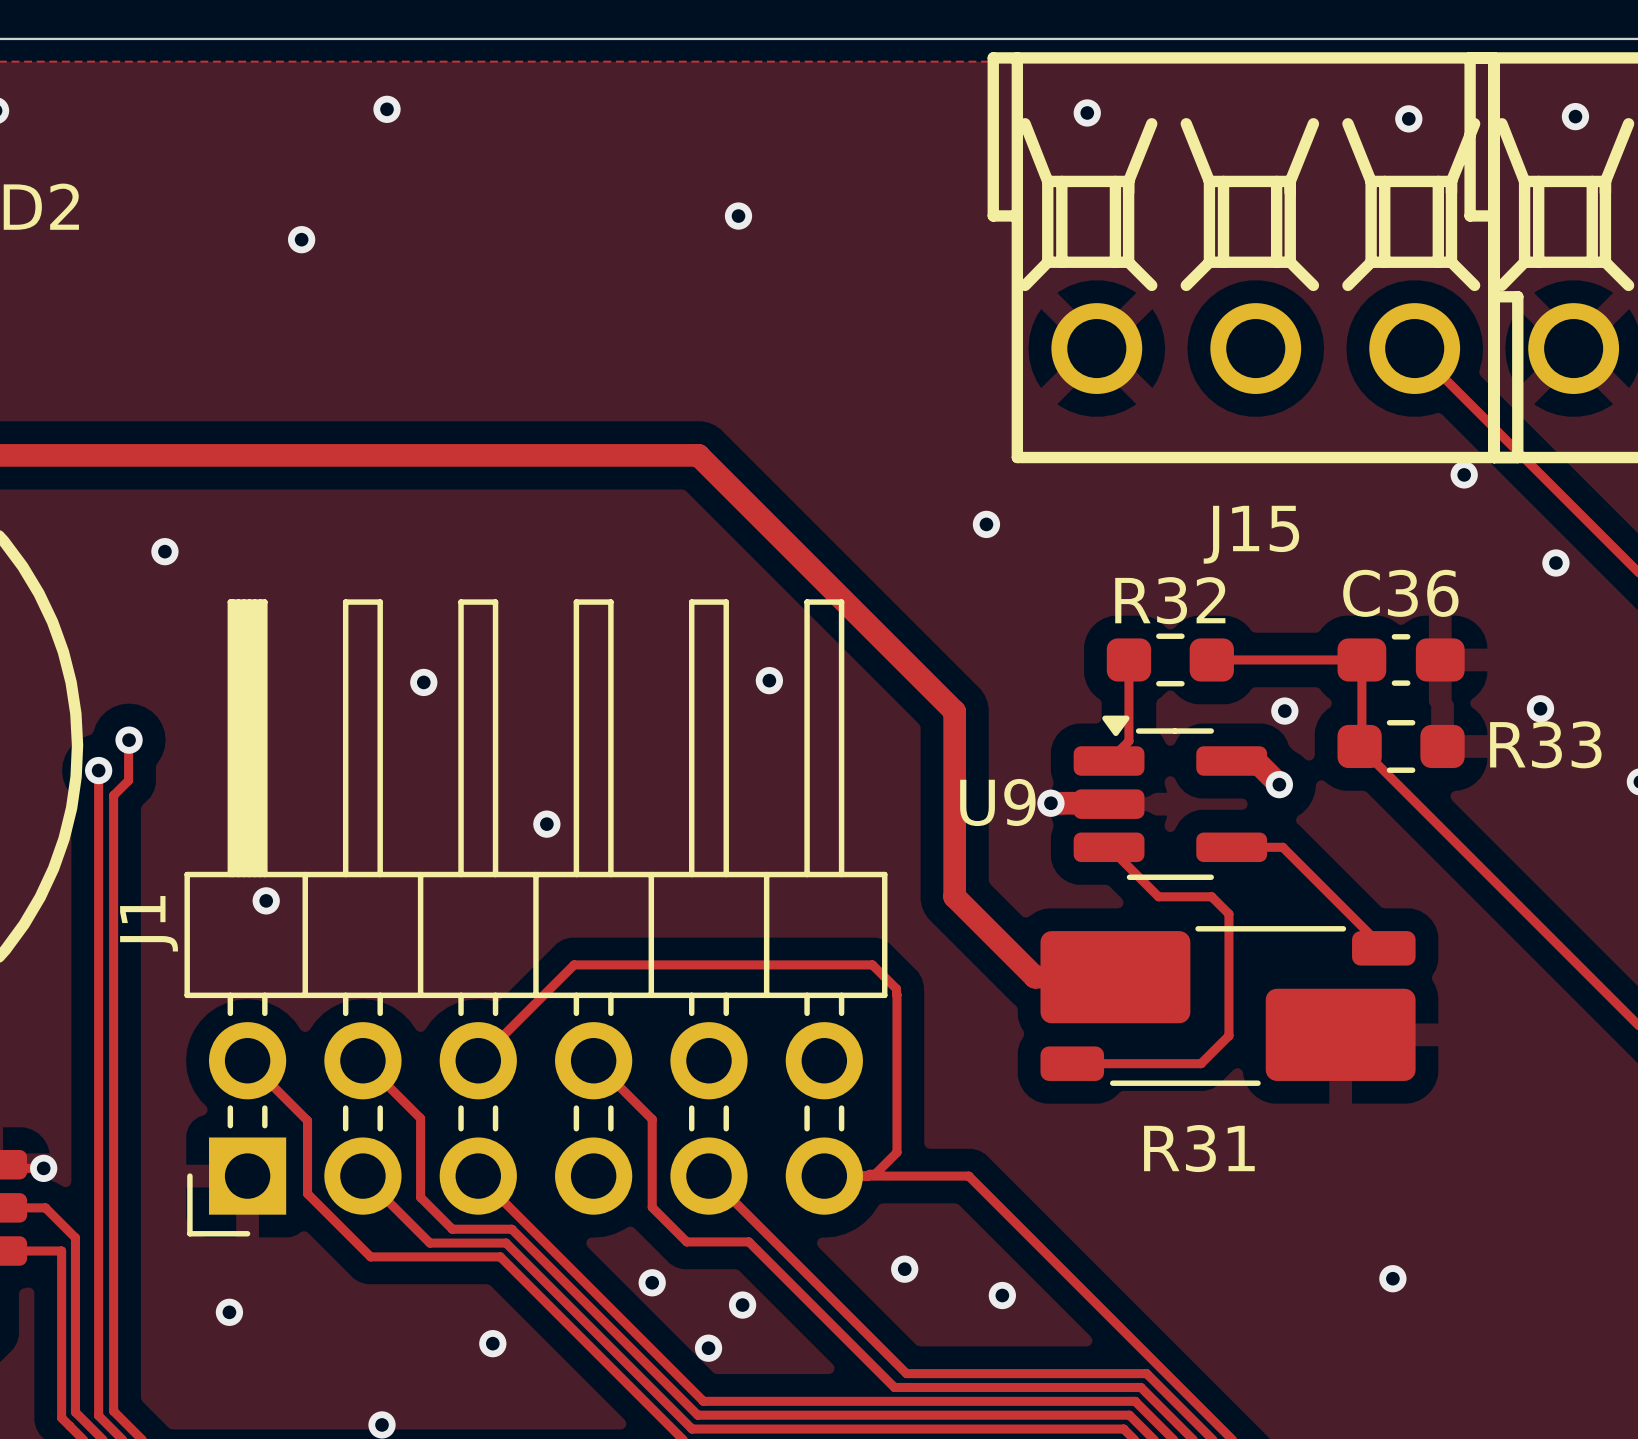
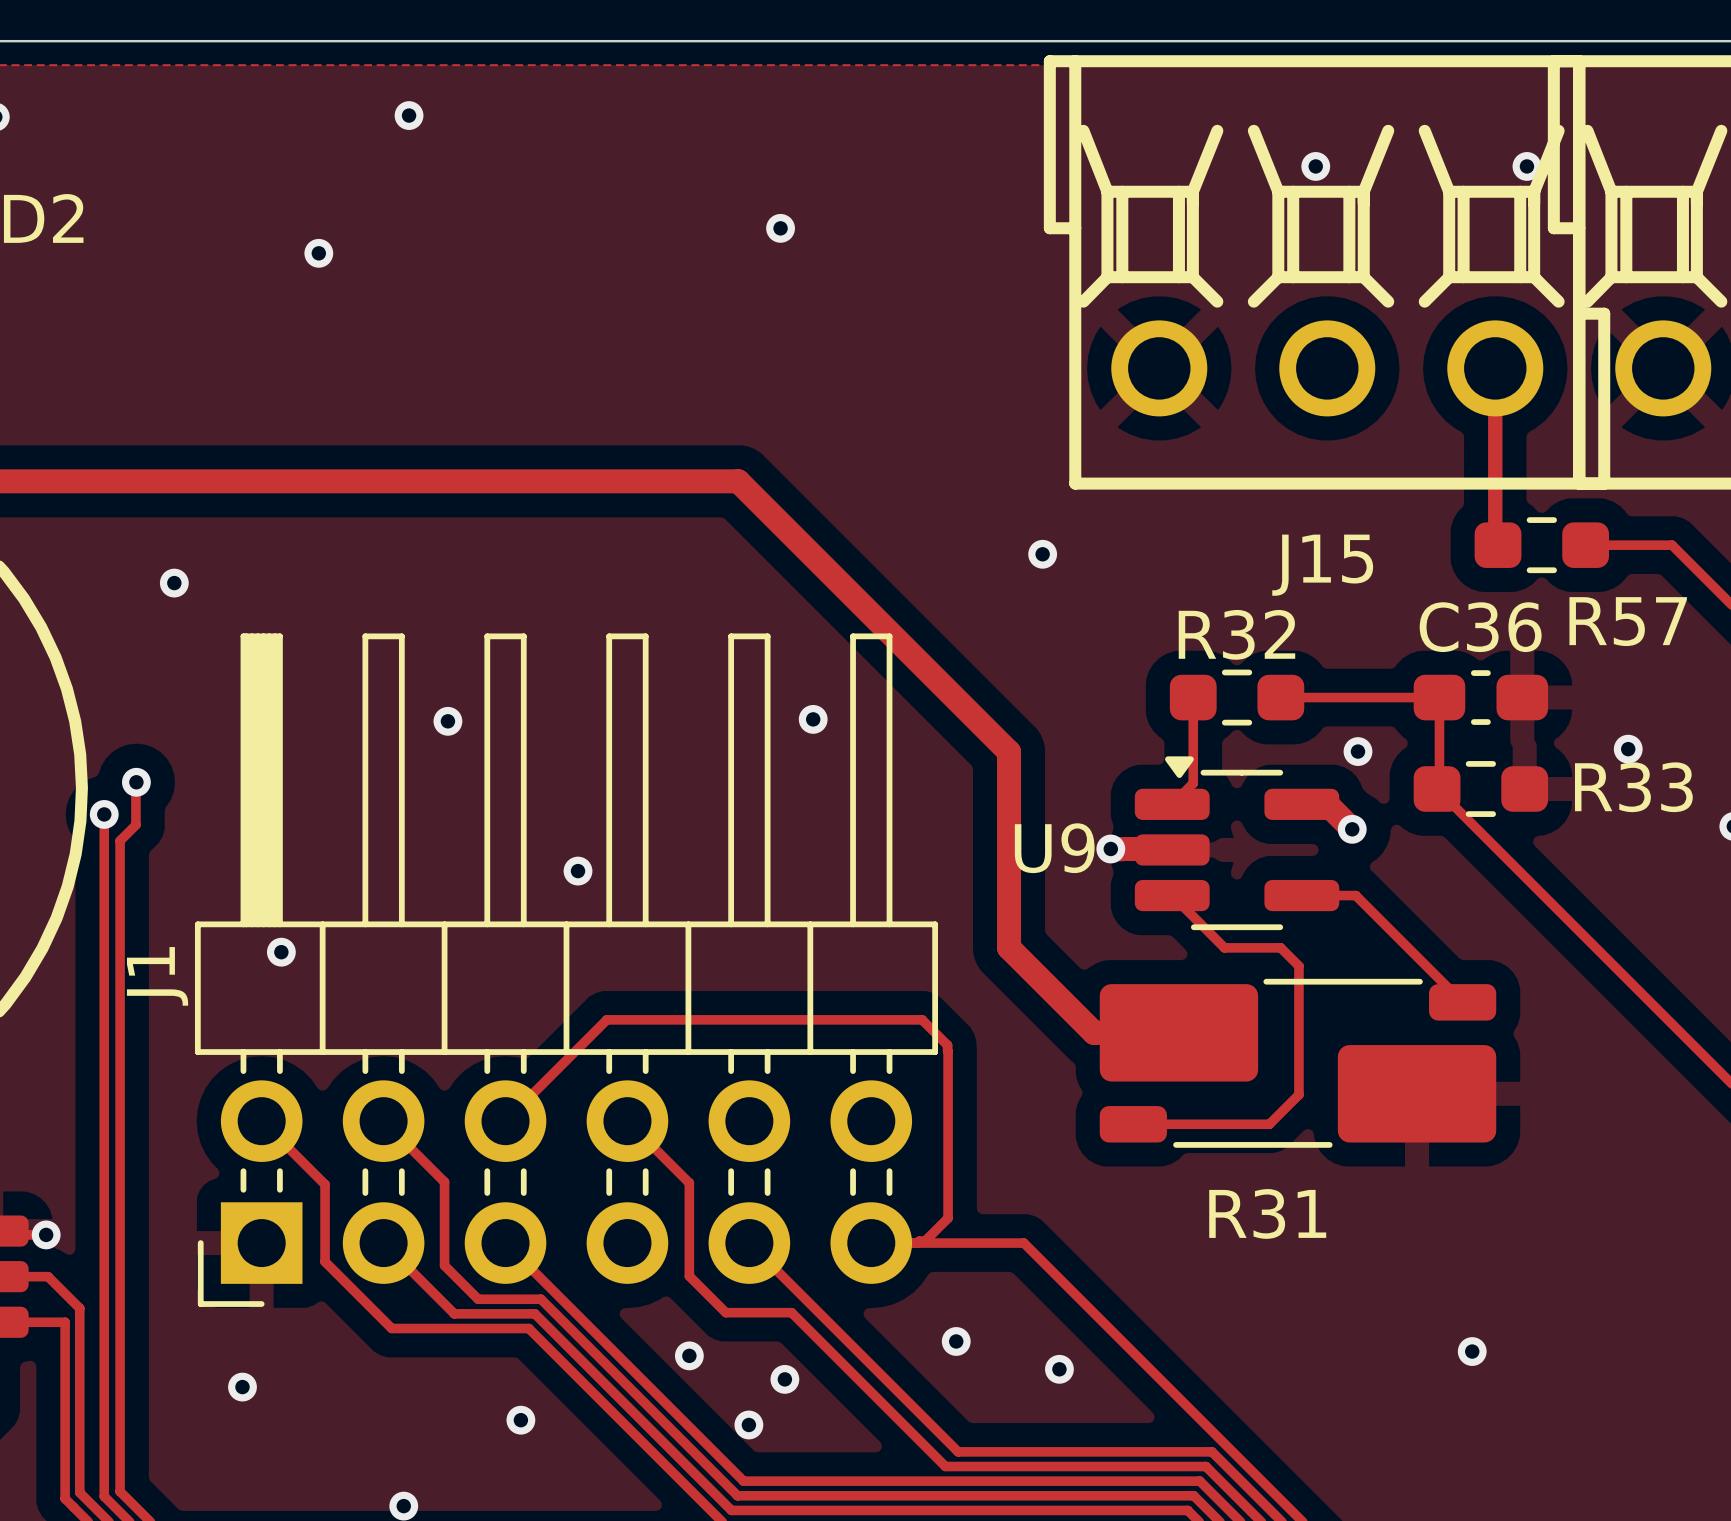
via: (1087, 112) -> none
via: (1575, 116) -> none
via position: (1408, 118) -> (1526, 166)
via: none -> (1315, 166)
track: (1414, 348) (1581, 515) -> (1495, 368) (1495, 542) (1498, 545)
via: (1464, 474) -> none
R57: none -> (1541, 545)
track: none -> (1585, 545) (1672, 545)
via: (1555, 563) -> none

